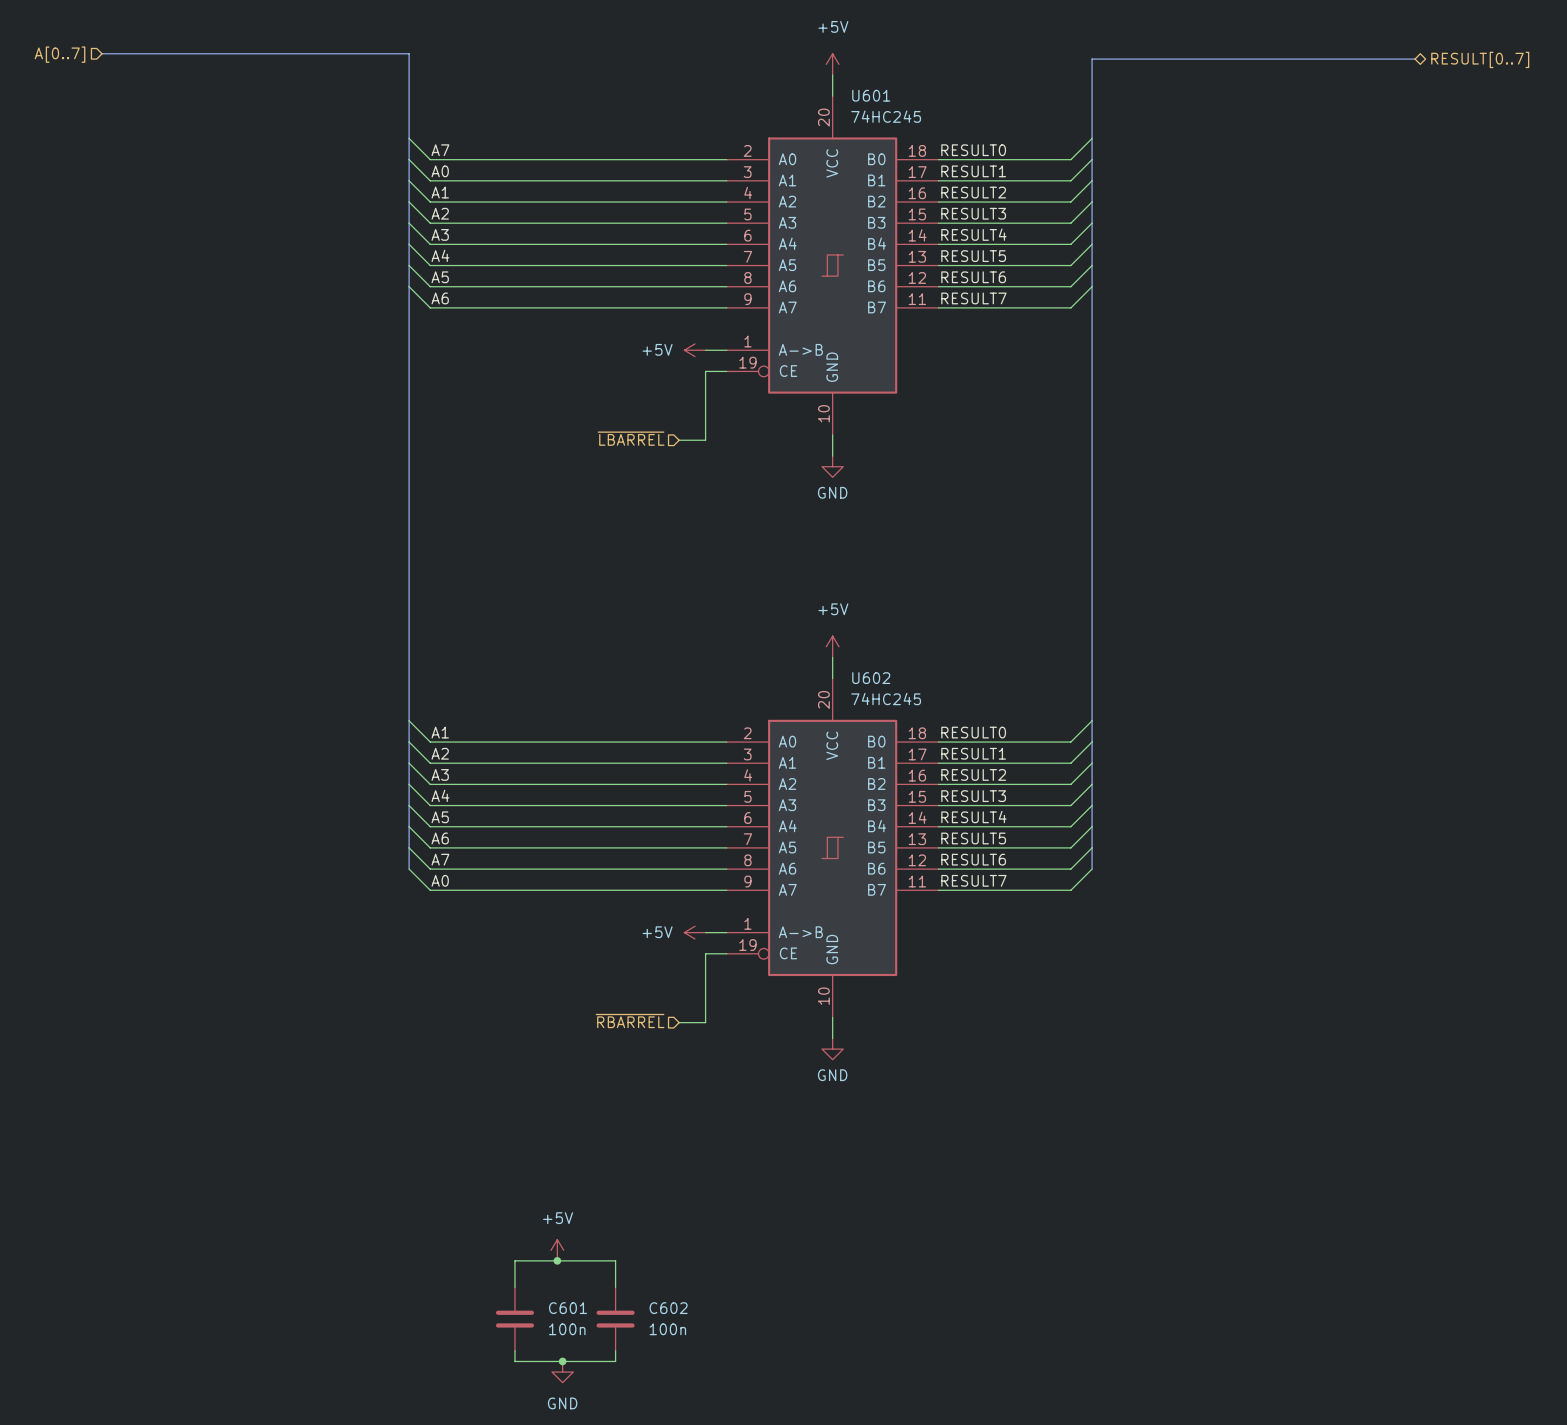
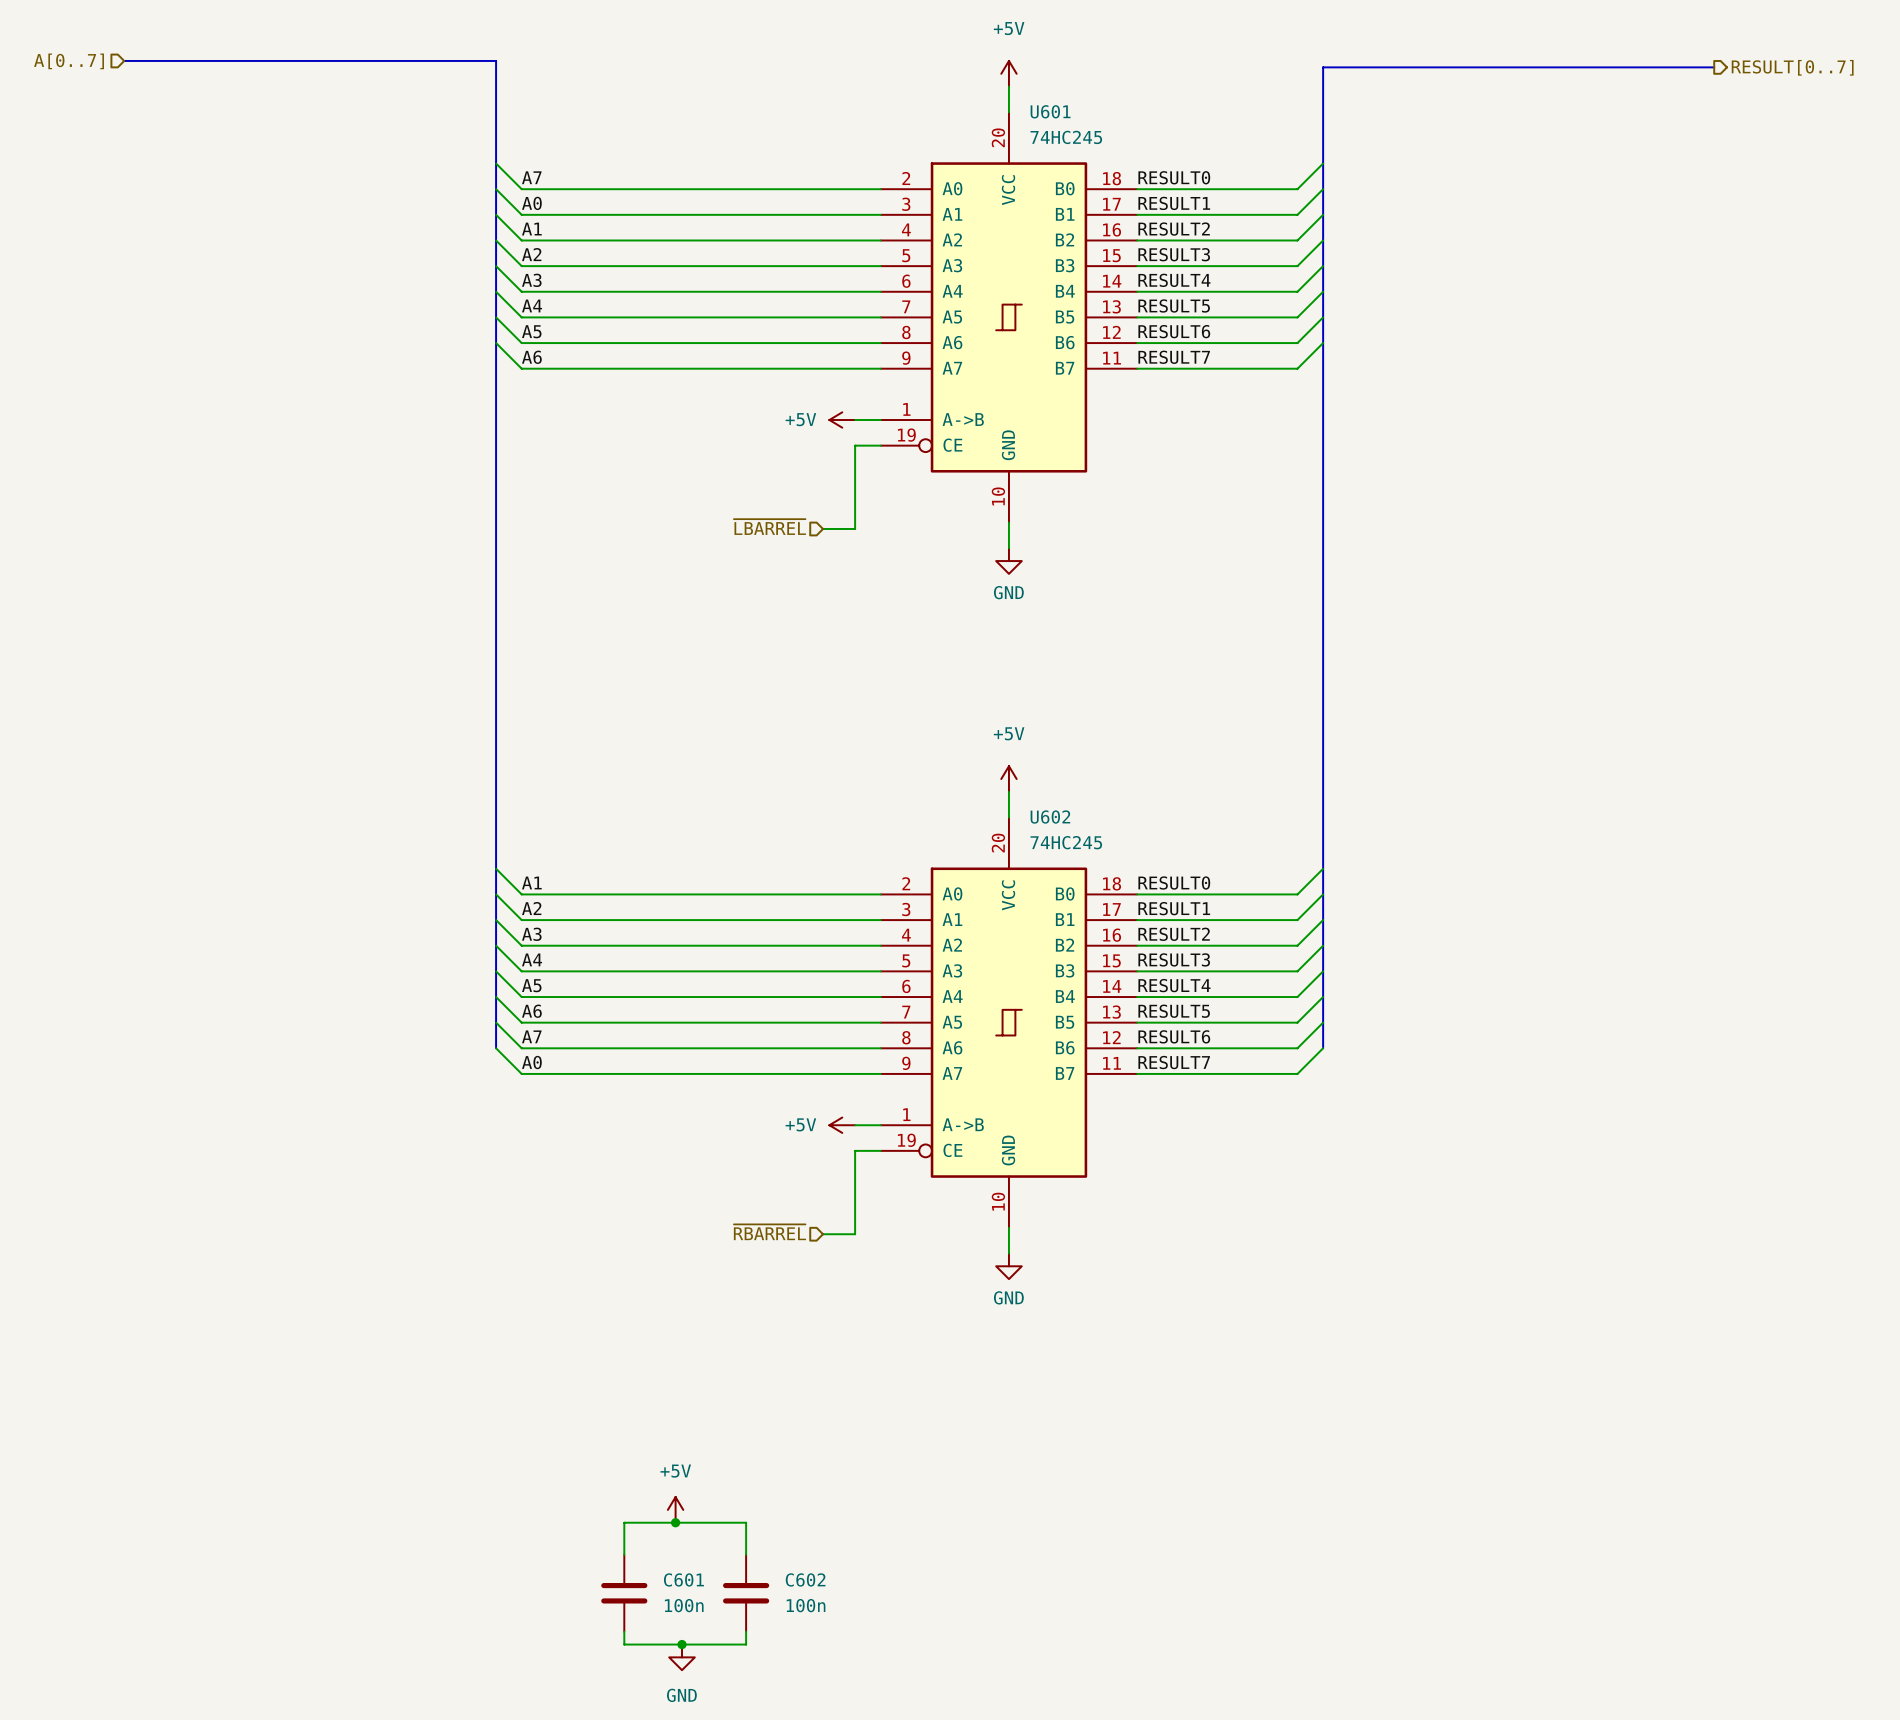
hierarchical label shape: bidirectional (1480, 59) -> output (1792, 67)

